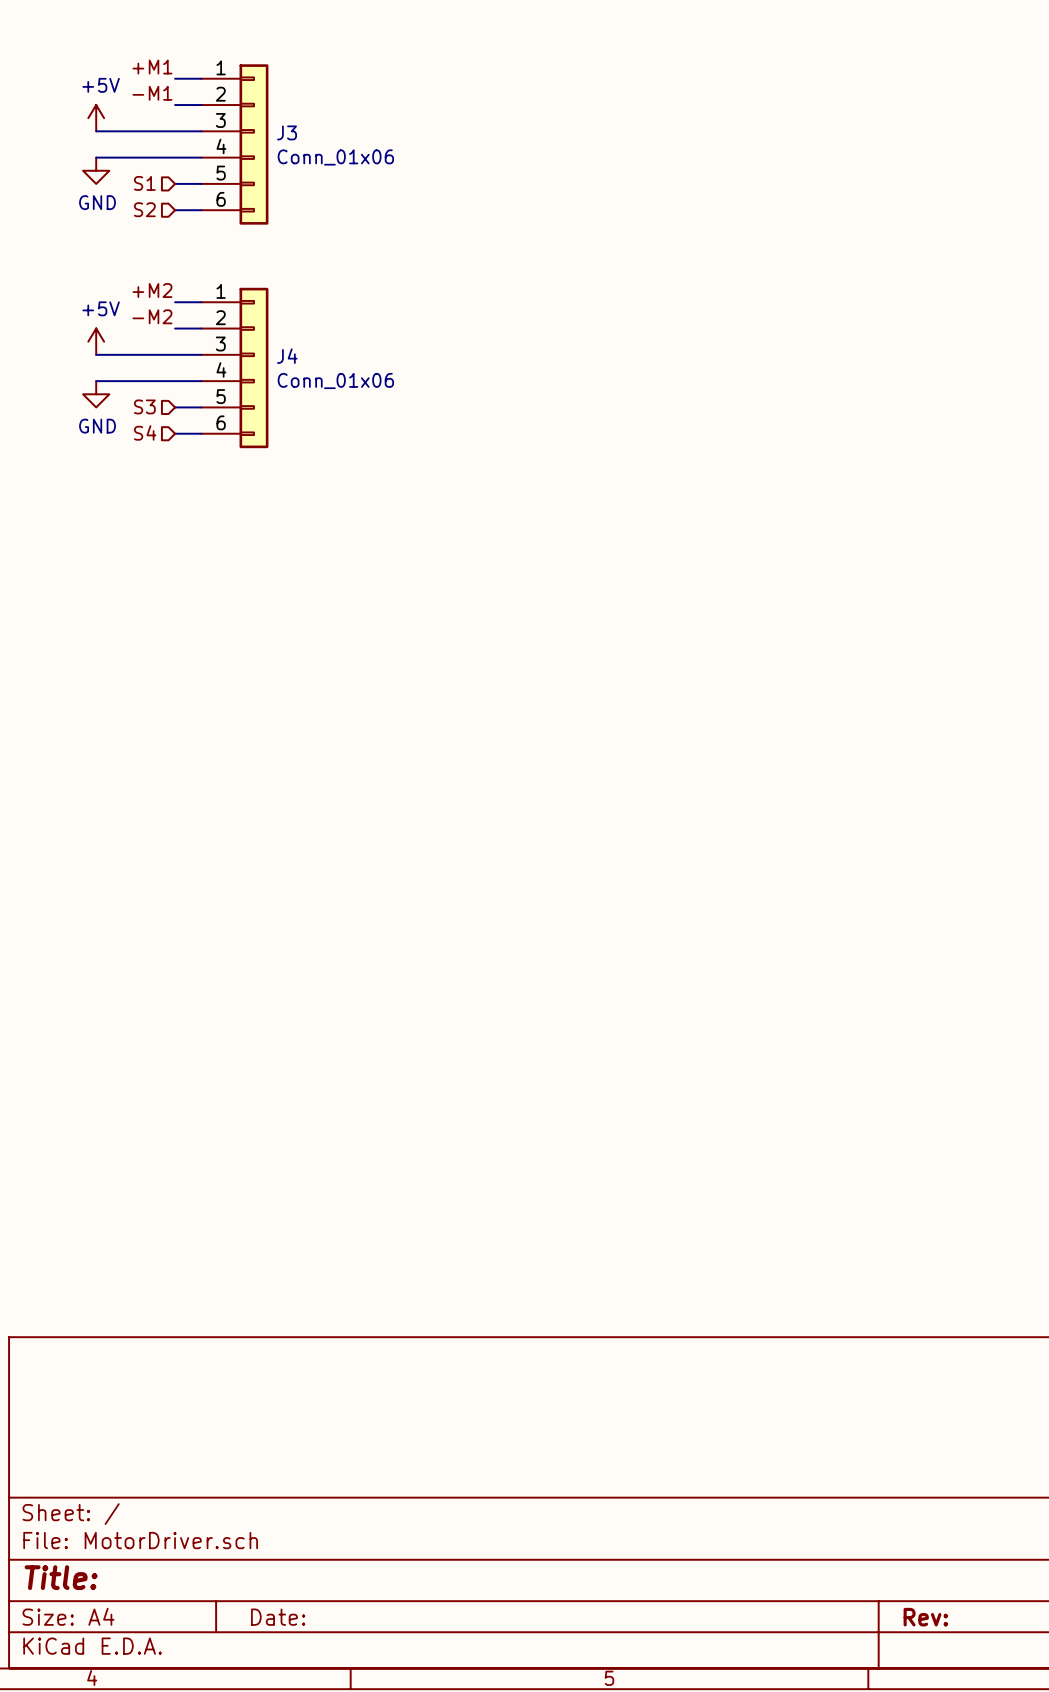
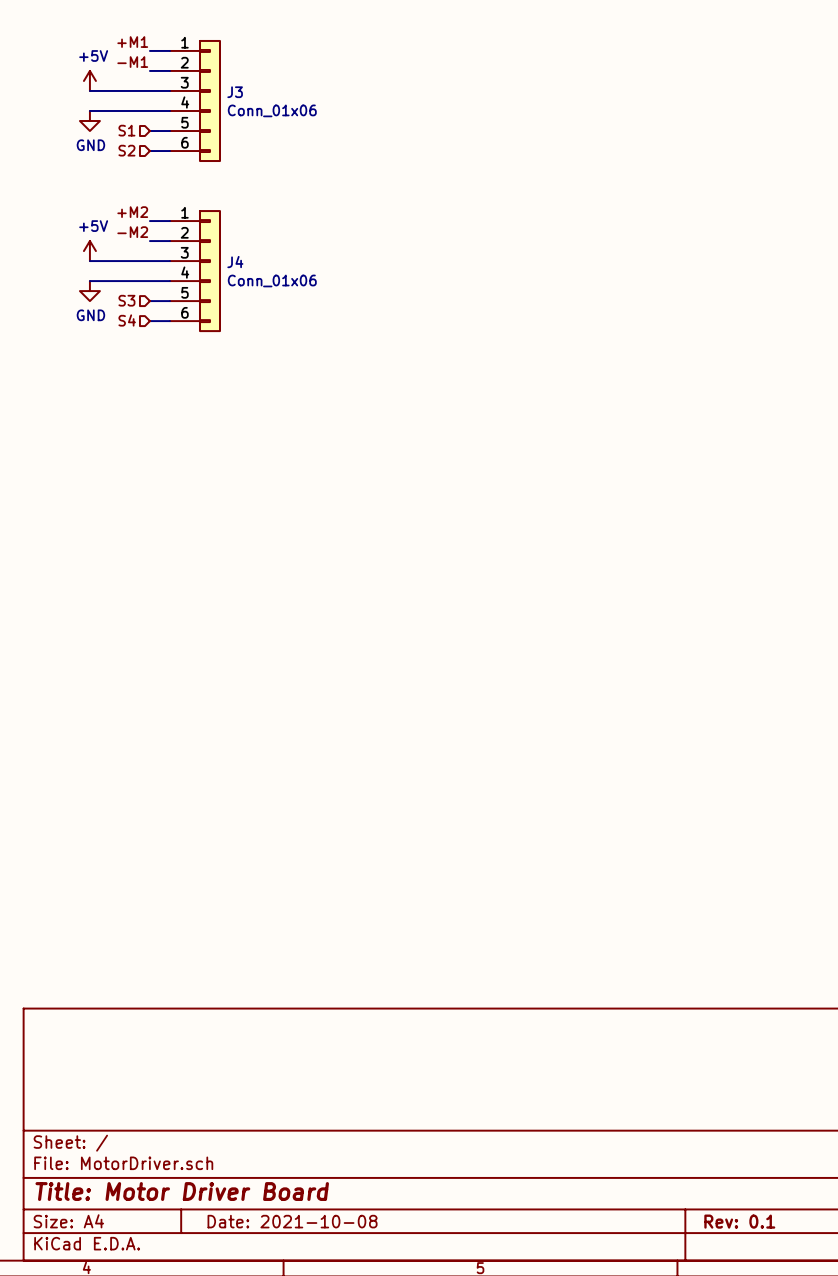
title block: Title: (61, 1577) -> Title: Motor Driver Board (182, 1191)
title block: Date: (278, 1617) -> Date: 2021-10-08 (292, 1221)
title block: Rev: (925, 1617) -> Rev: 0.1 (739, 1221)

